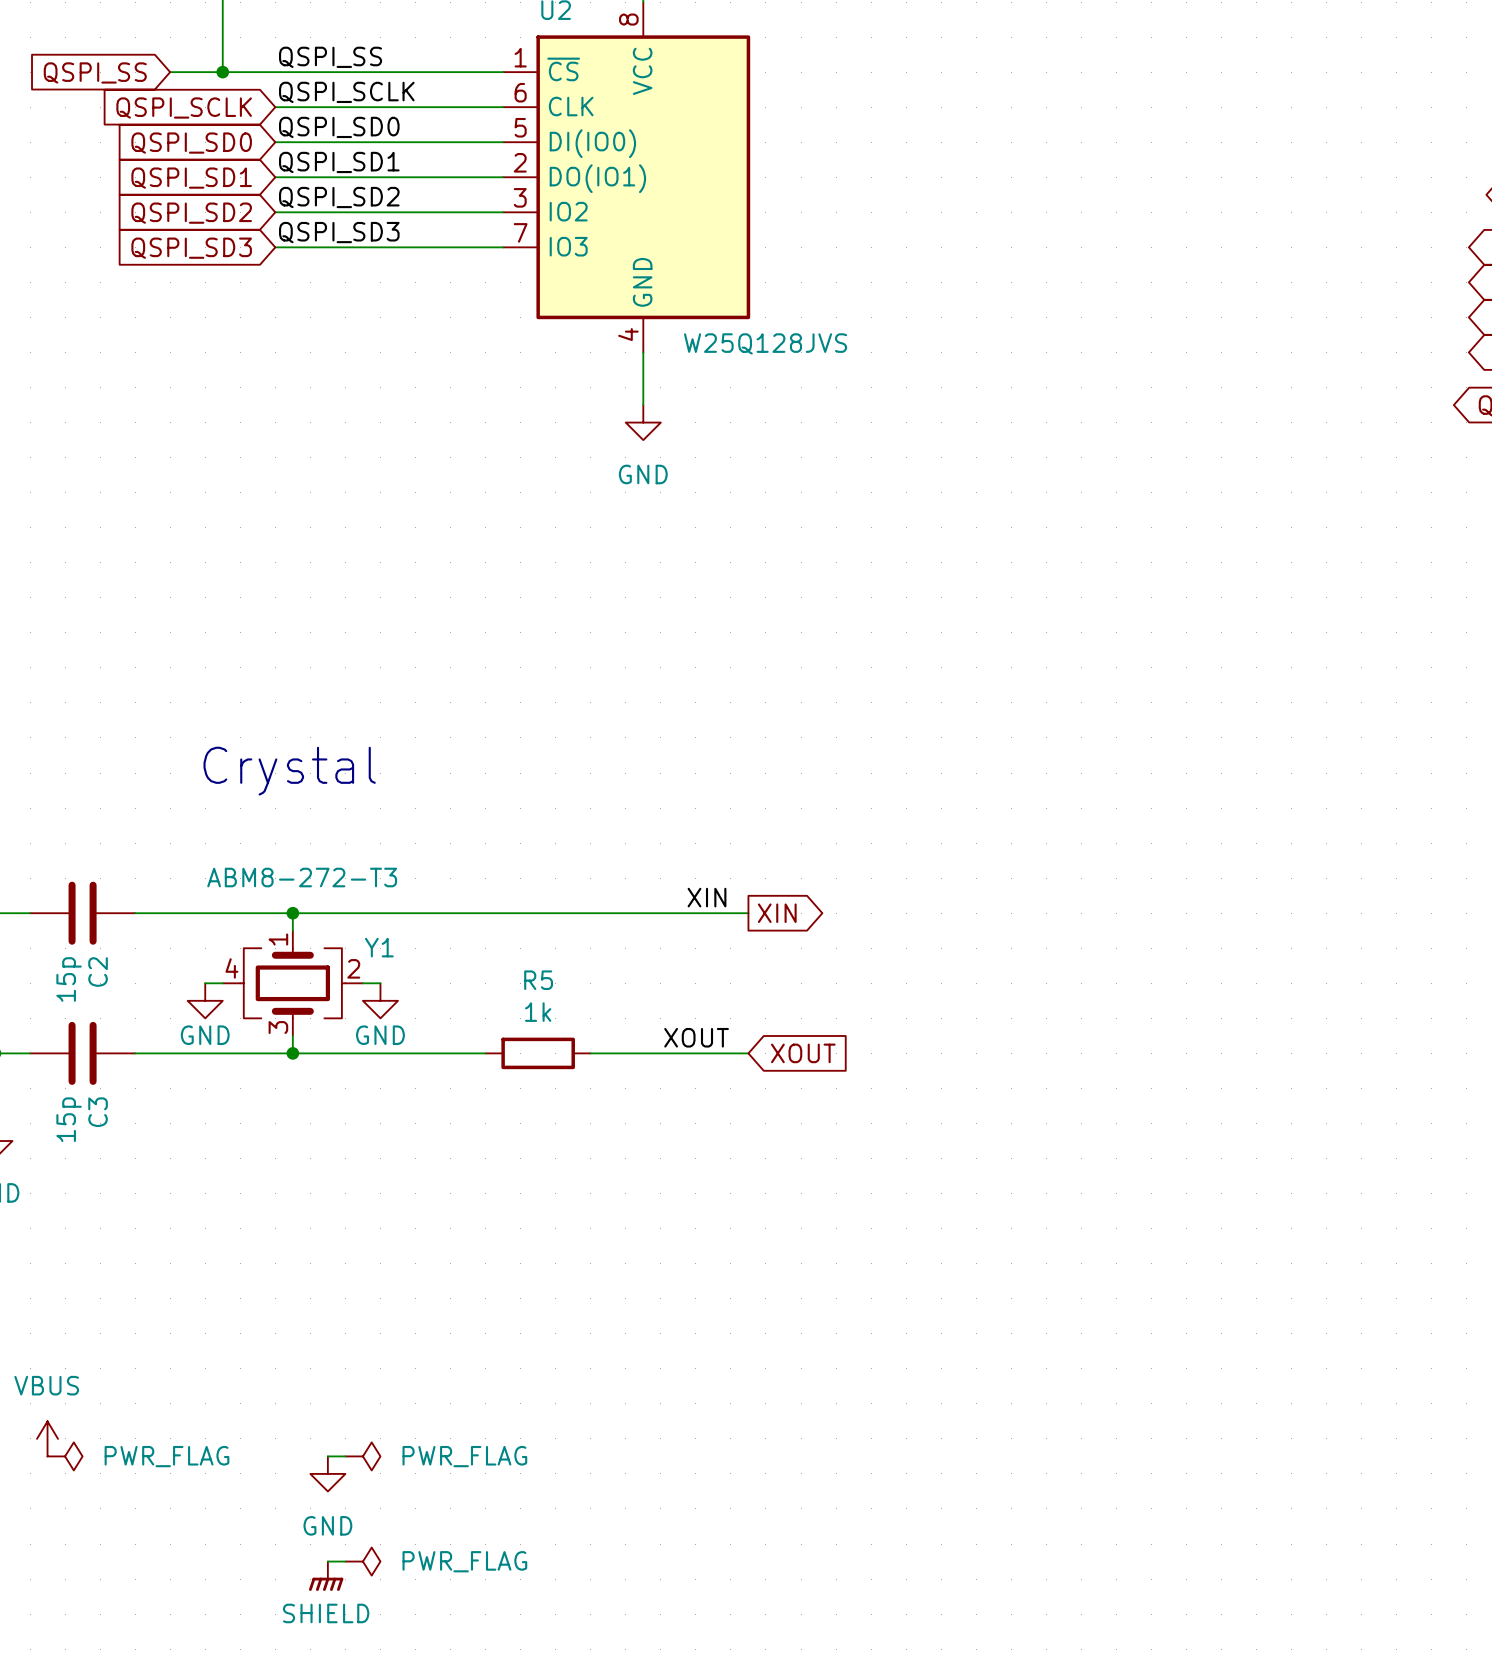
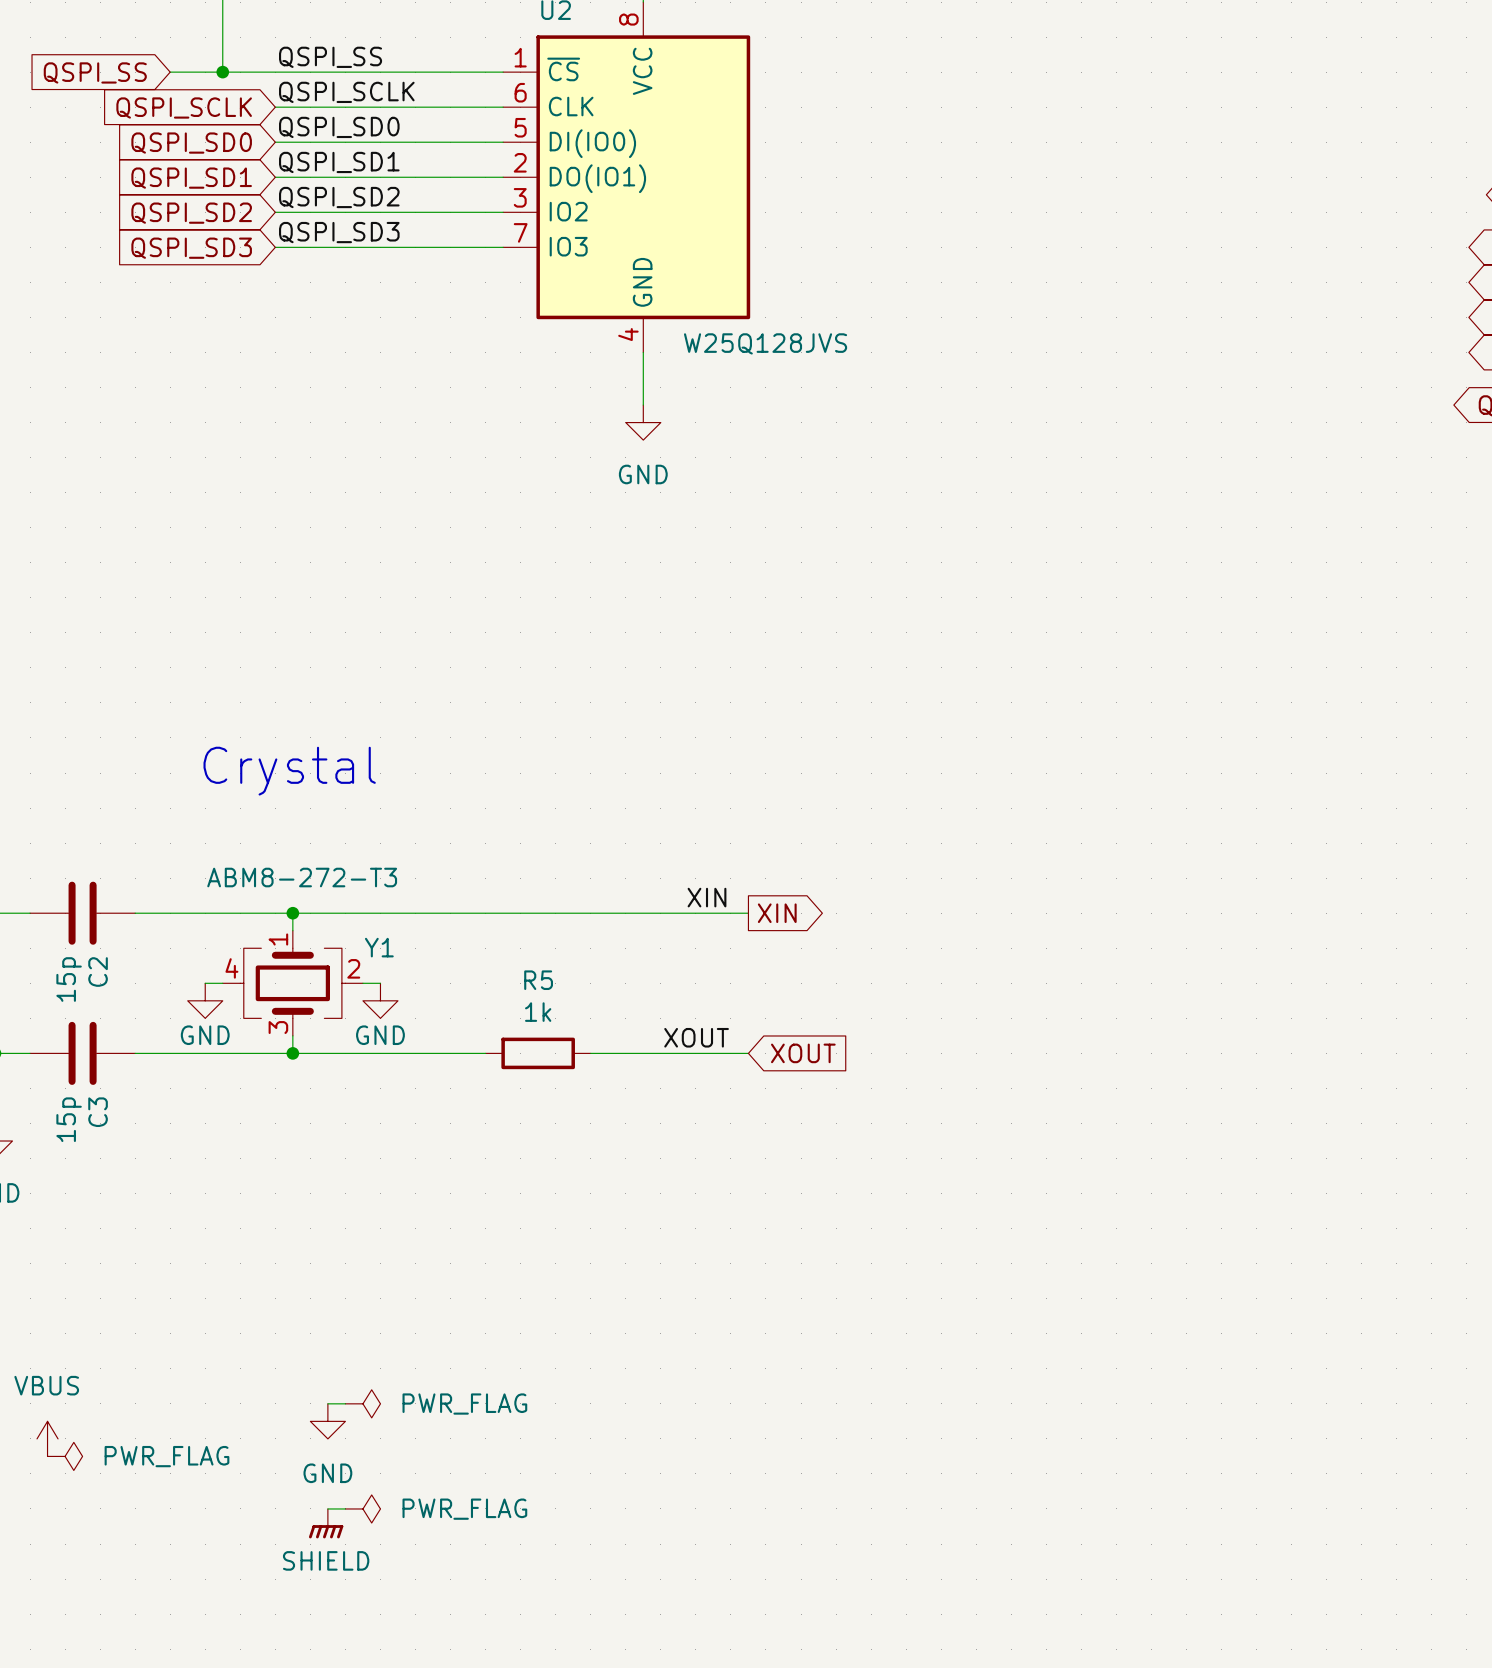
power symbol: none -> PWR_FLAG (362, 1403)
wire: (327, 1456) (345, 1456) -> (327, 1403) (345, 1403)
power symbol: PWR_FLAG (362, 1456) -> none
power symbol position: GND (327, 1473) -> GND (327, 1421)
power symbol: none -> PWR_FLAG (362, 1508)
wire: (327, 1561) (345, 1561) -> (327, 1508) (345, 1508)
power symbol: PWR_FLAG (362, 1561) -> none
power symbol position: SHIELD (326, 1576) -> SHIELD (326, 1523)

